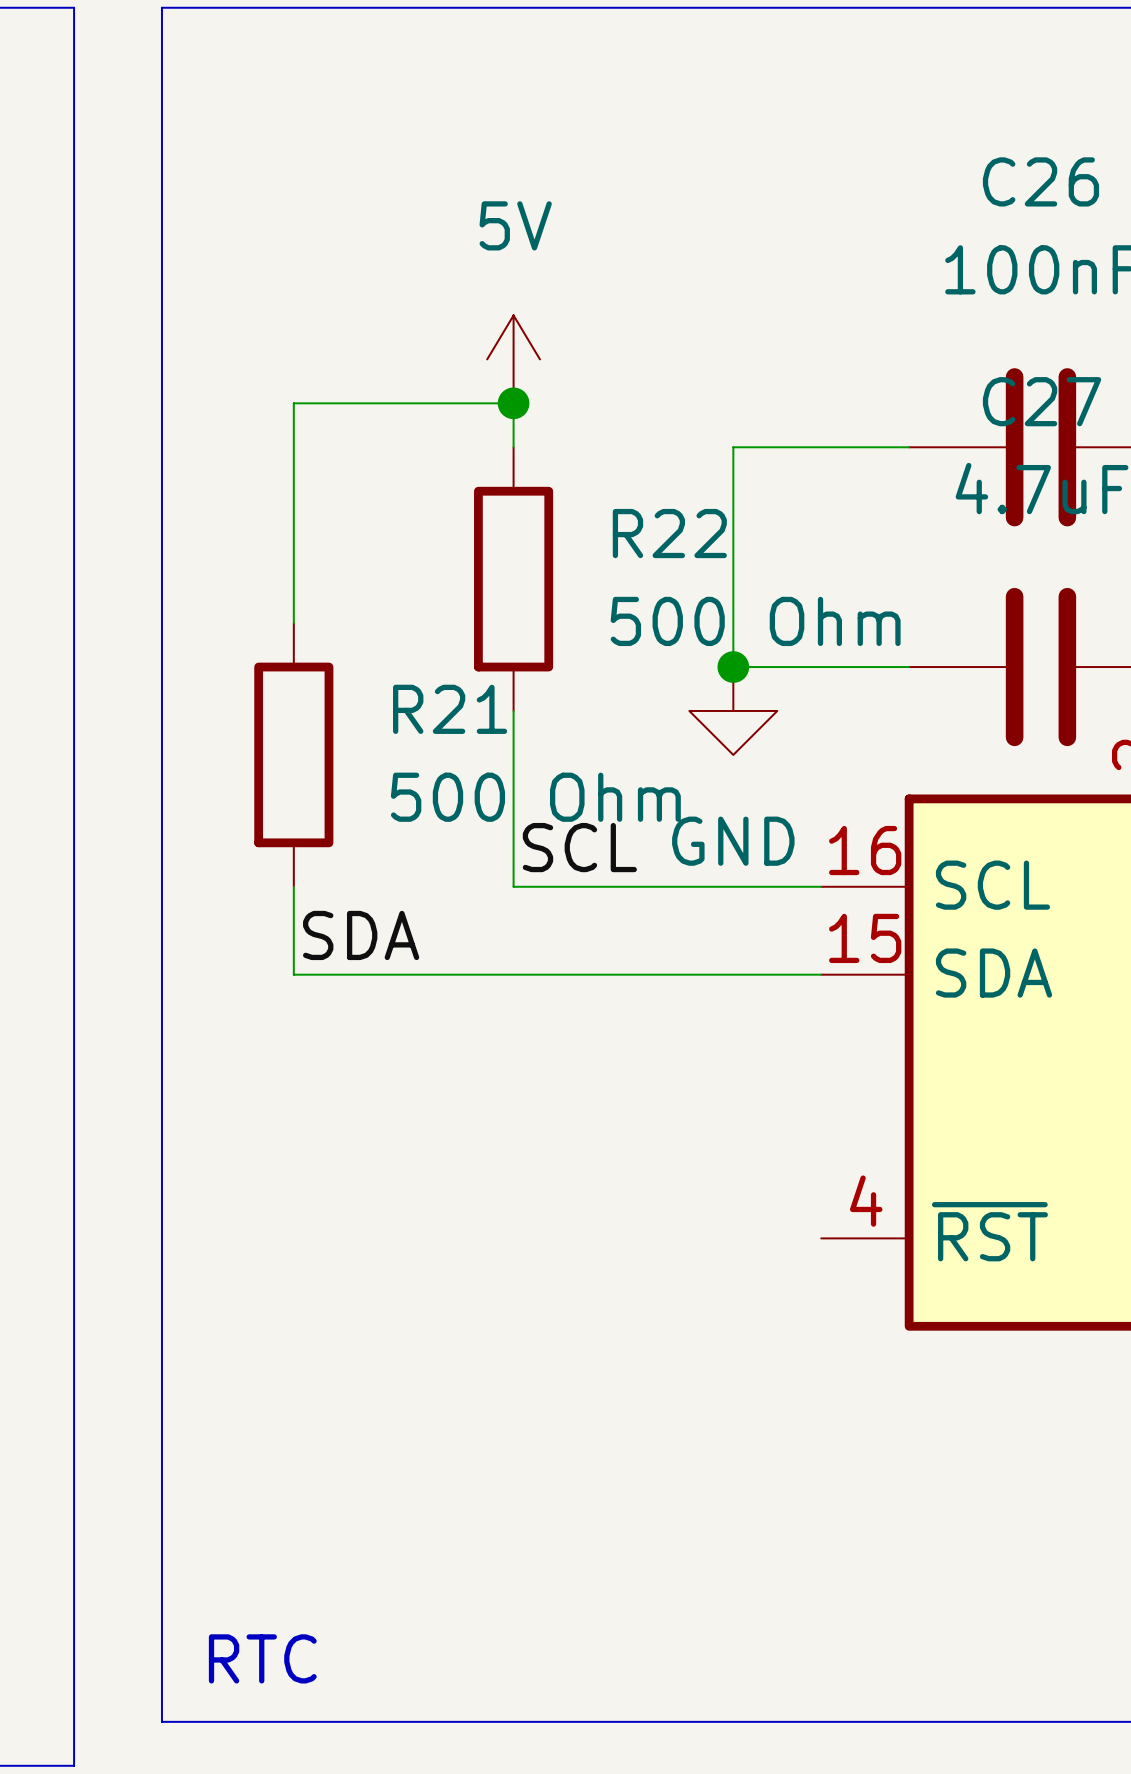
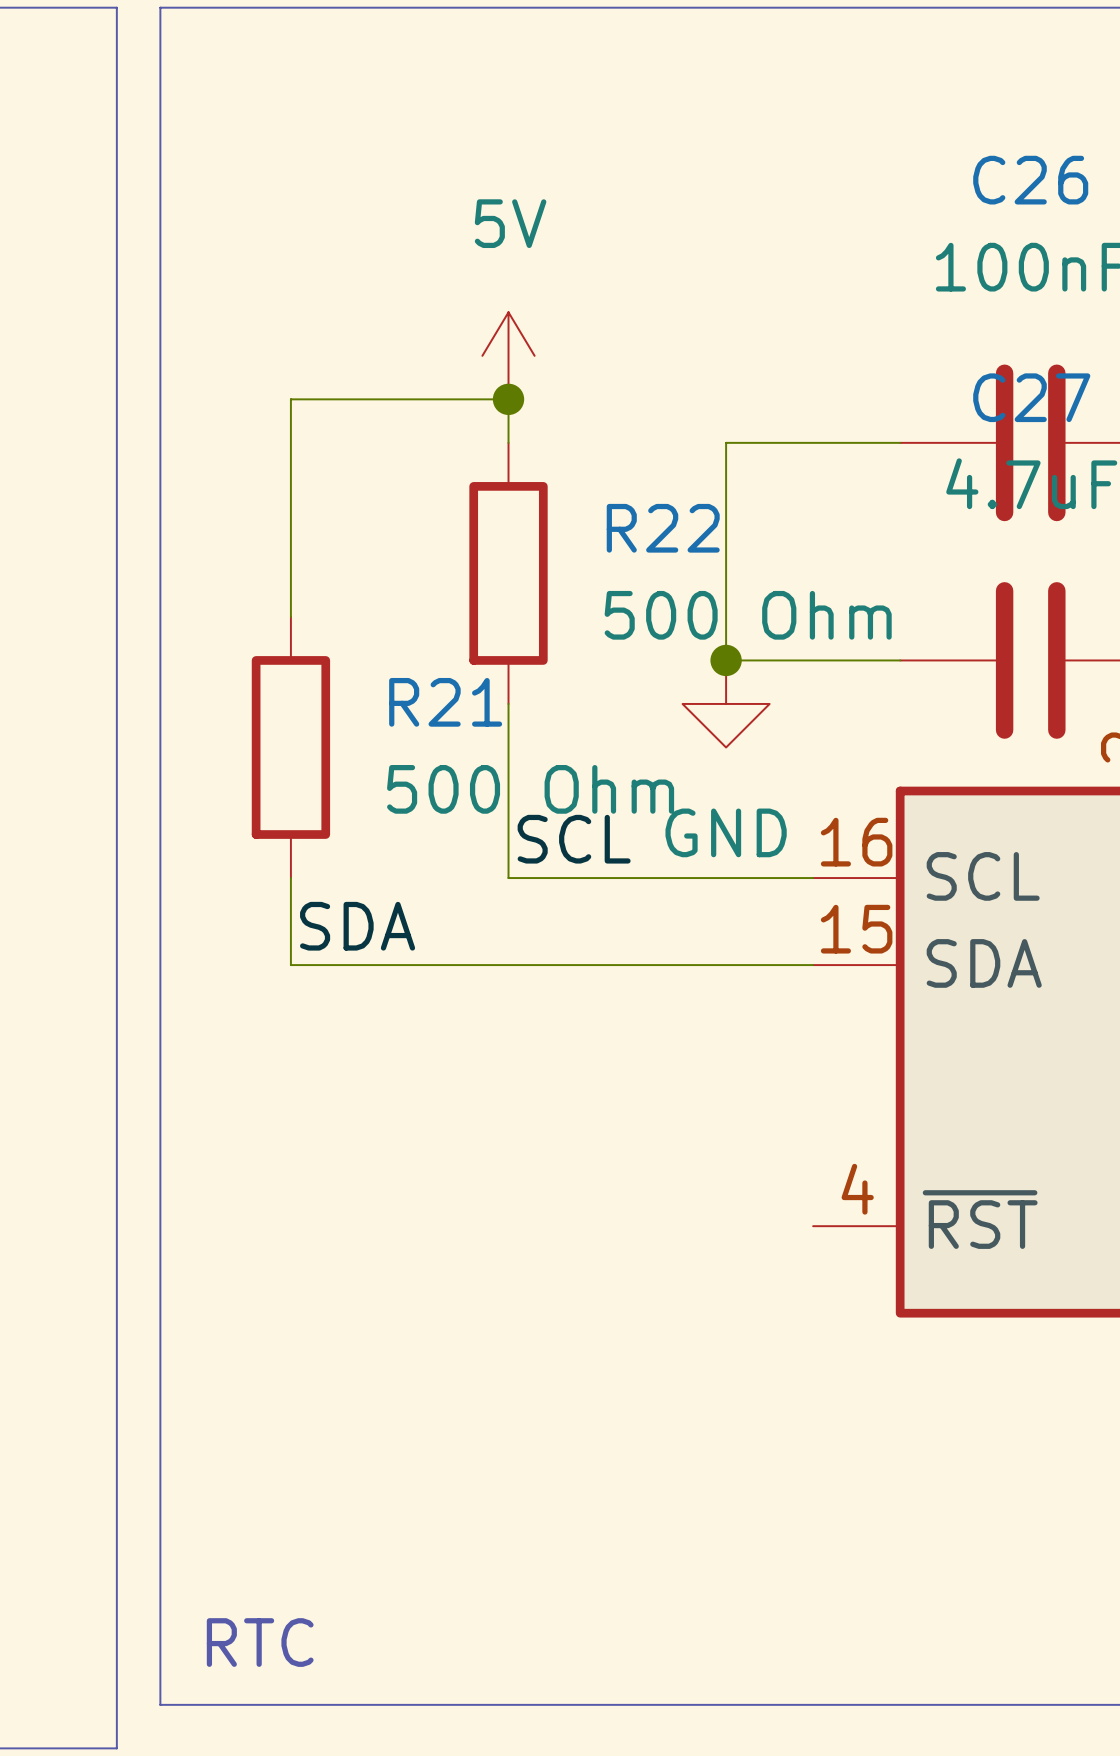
line: (74, 7) (74, 1765) -> (73, 7) (116, 7) (116, 1748) (73, 1748)

